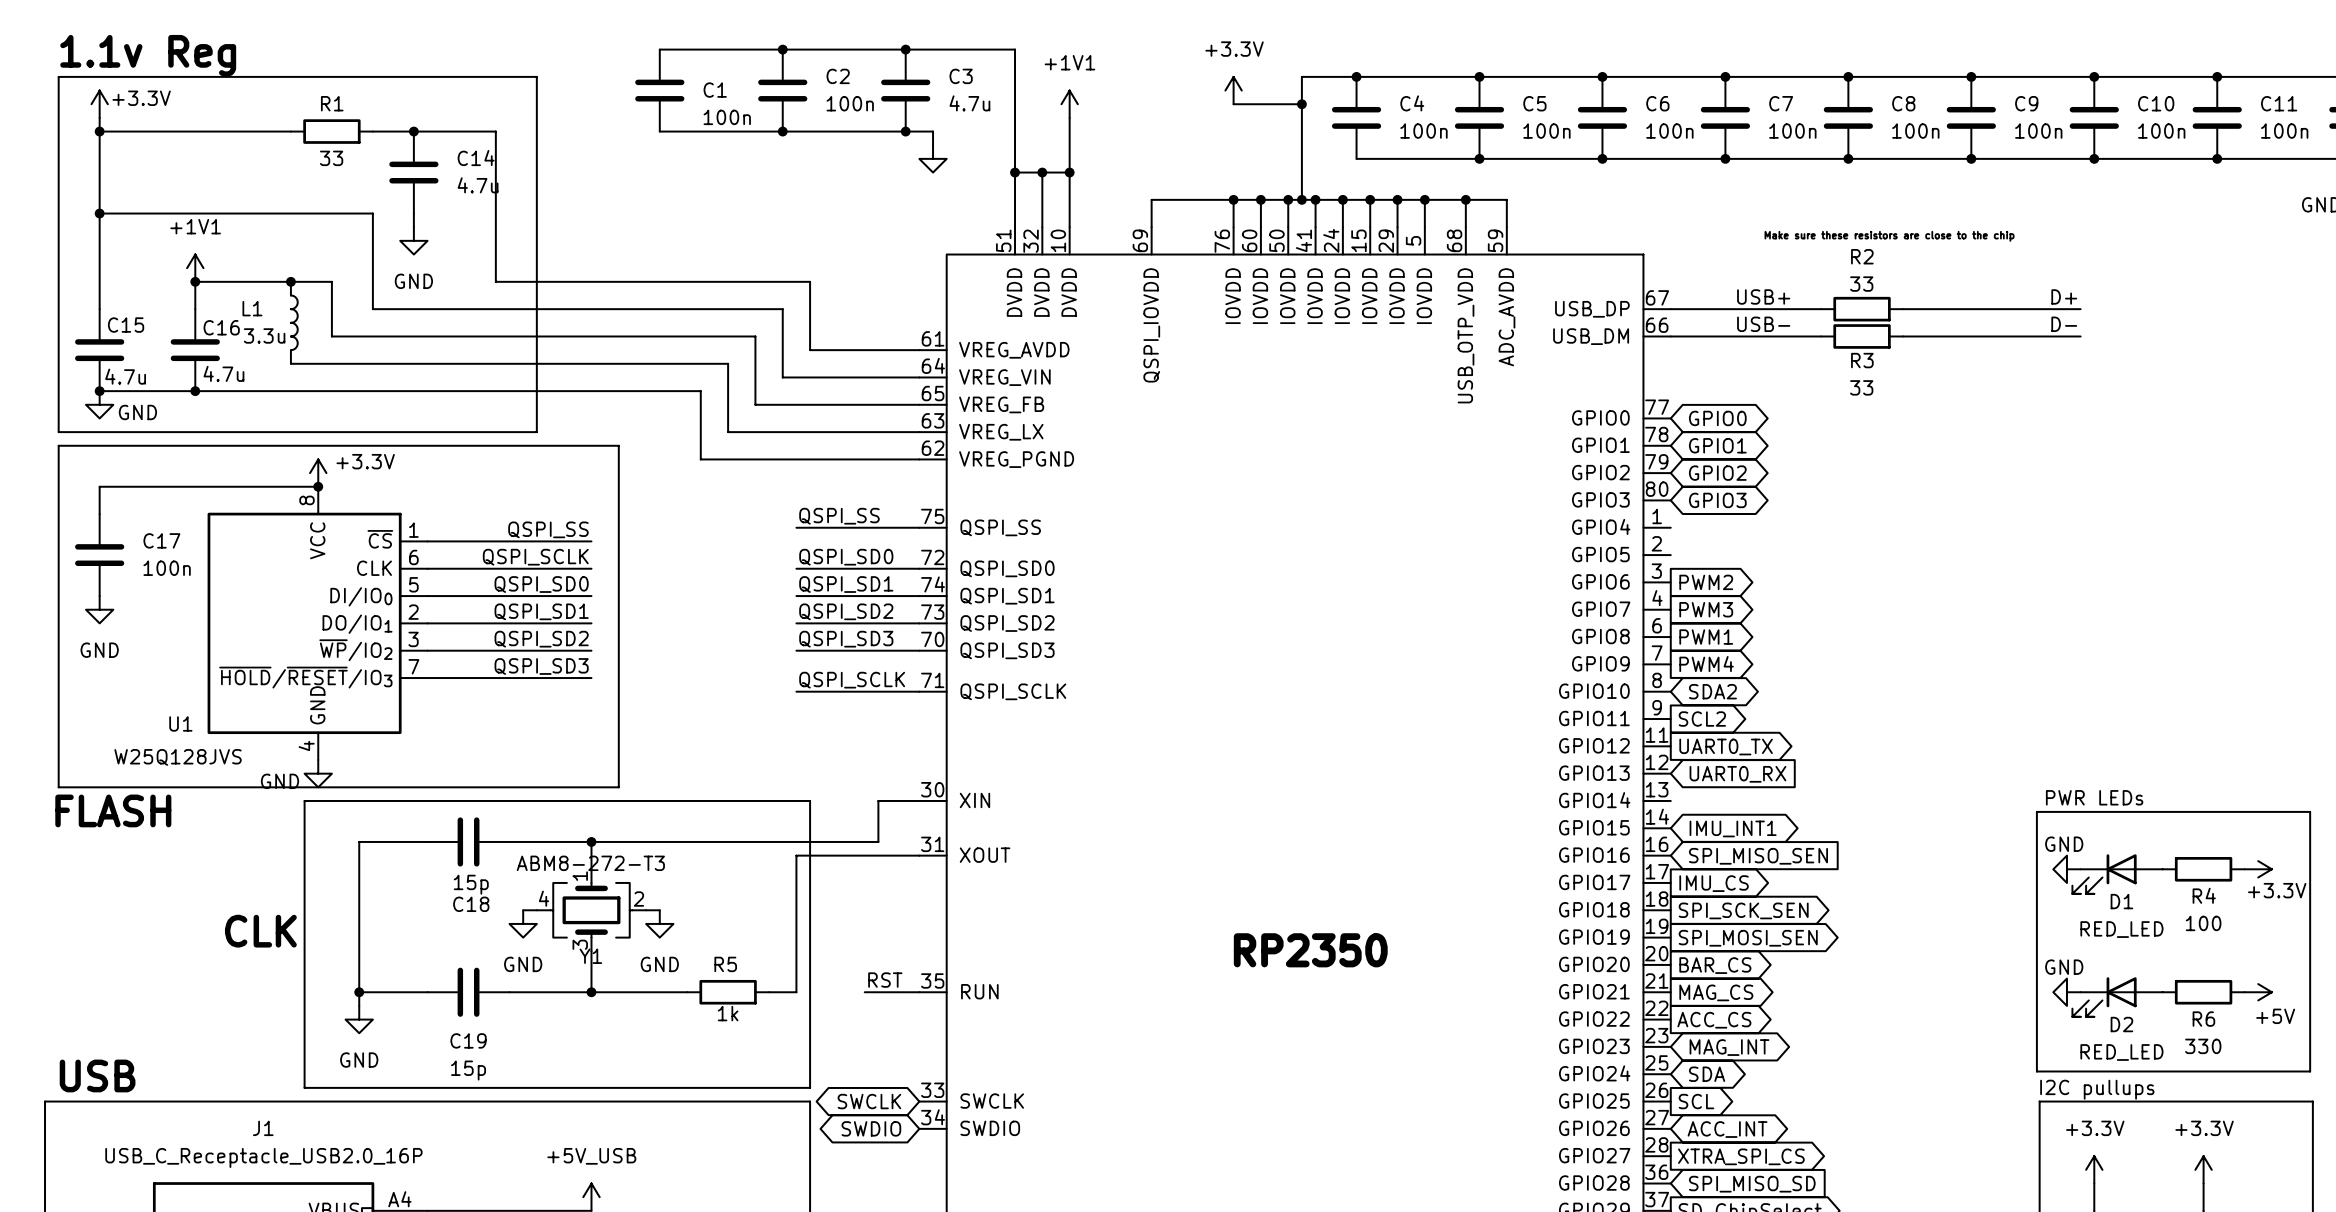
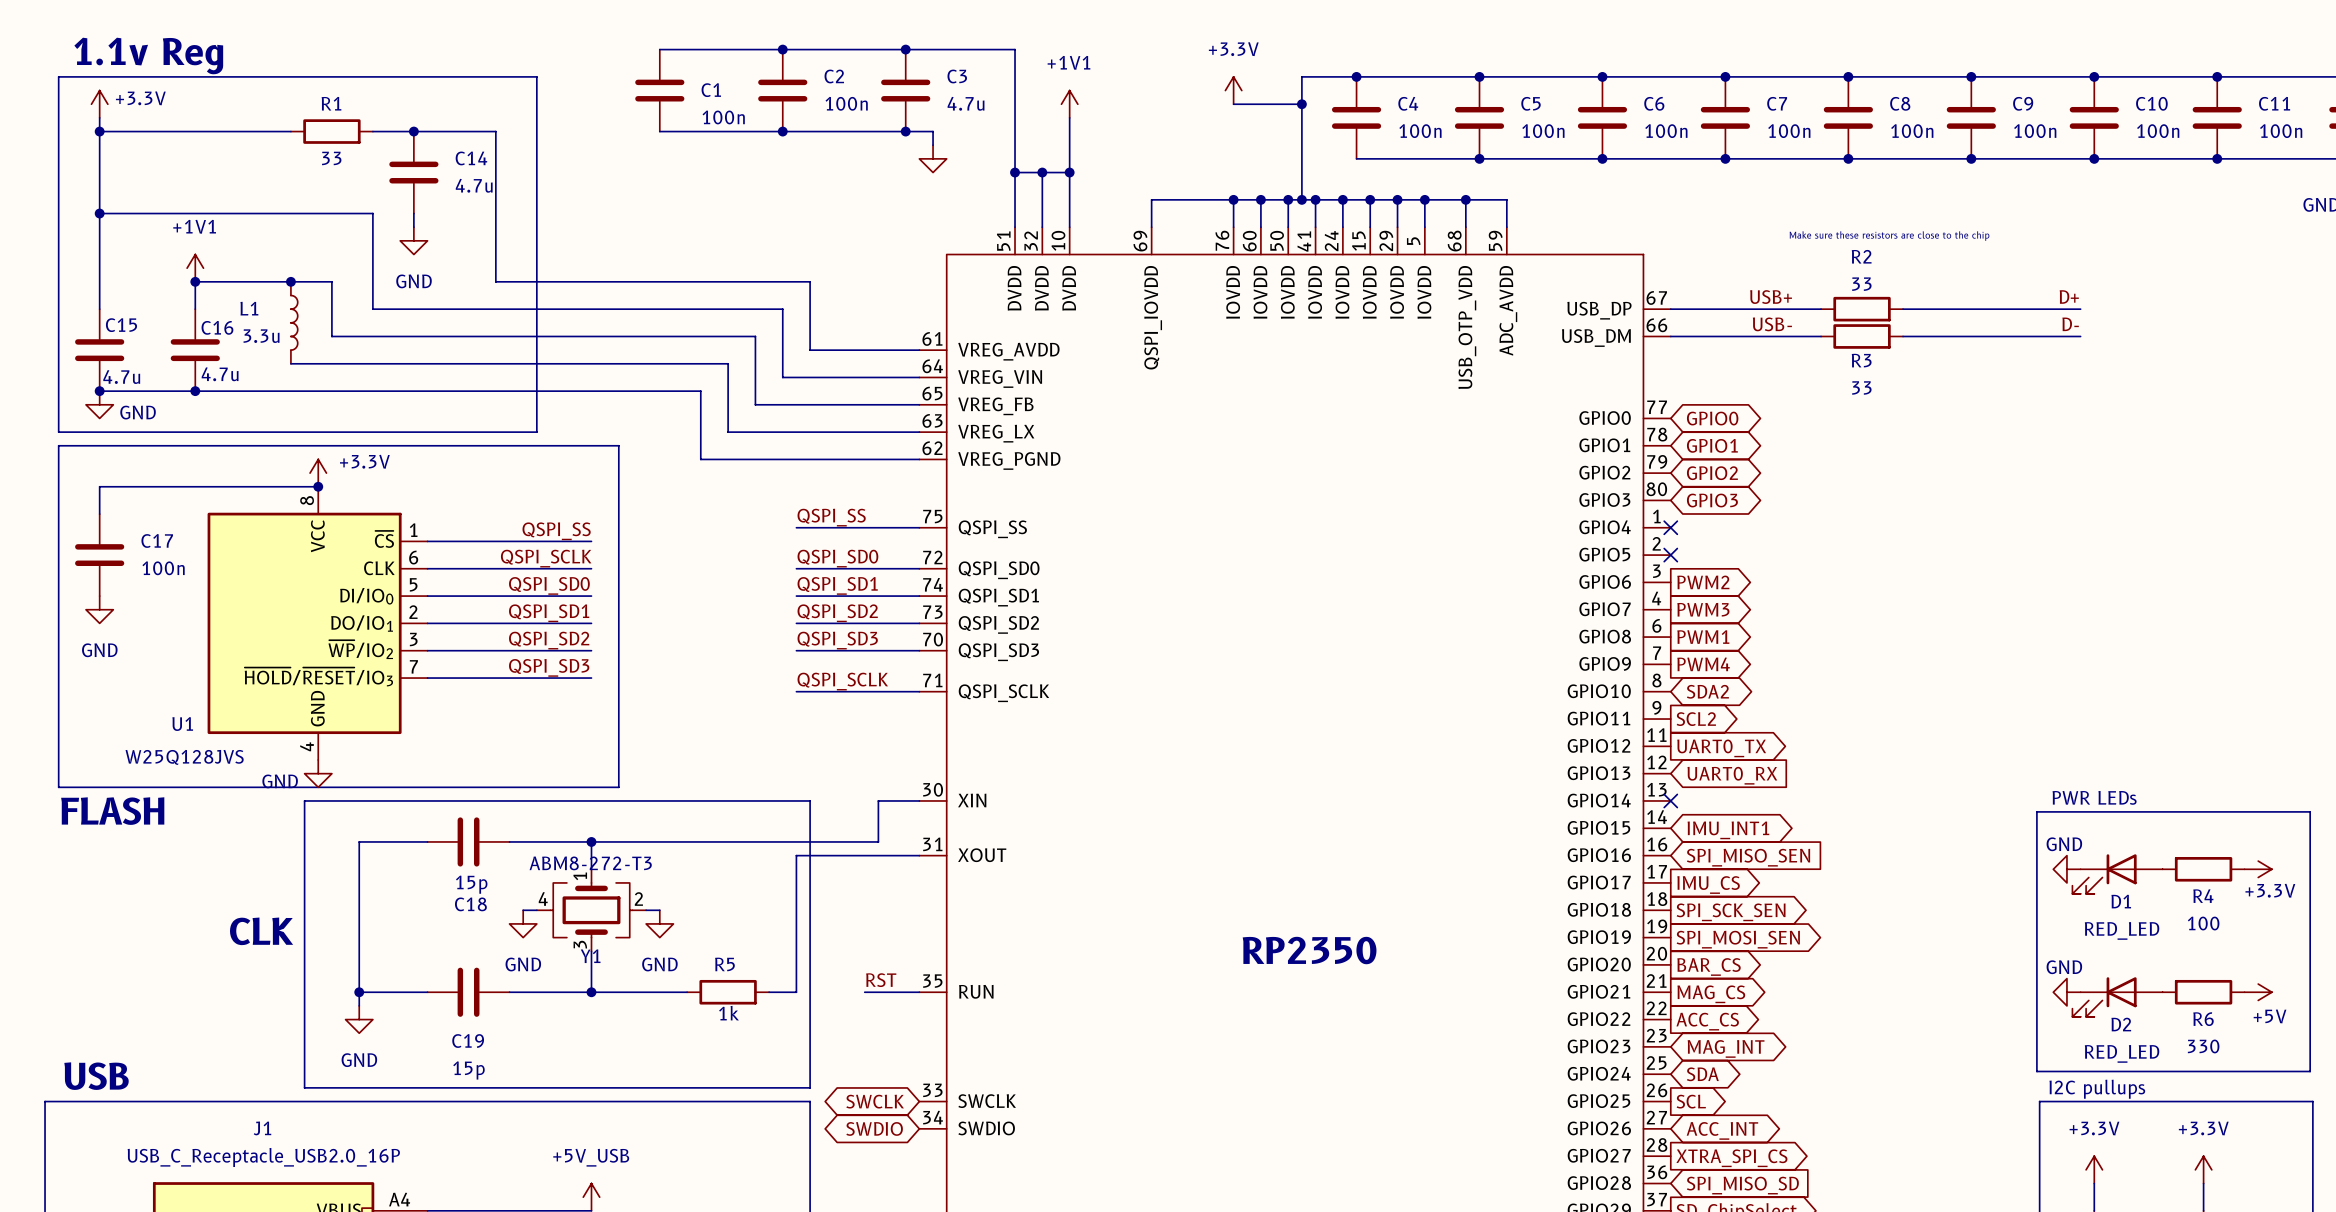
no-connect mark: none -> (1670, 527)
no-connect mark: none -> (1670, 555)
no-connect mark: none -> (1670, 800)

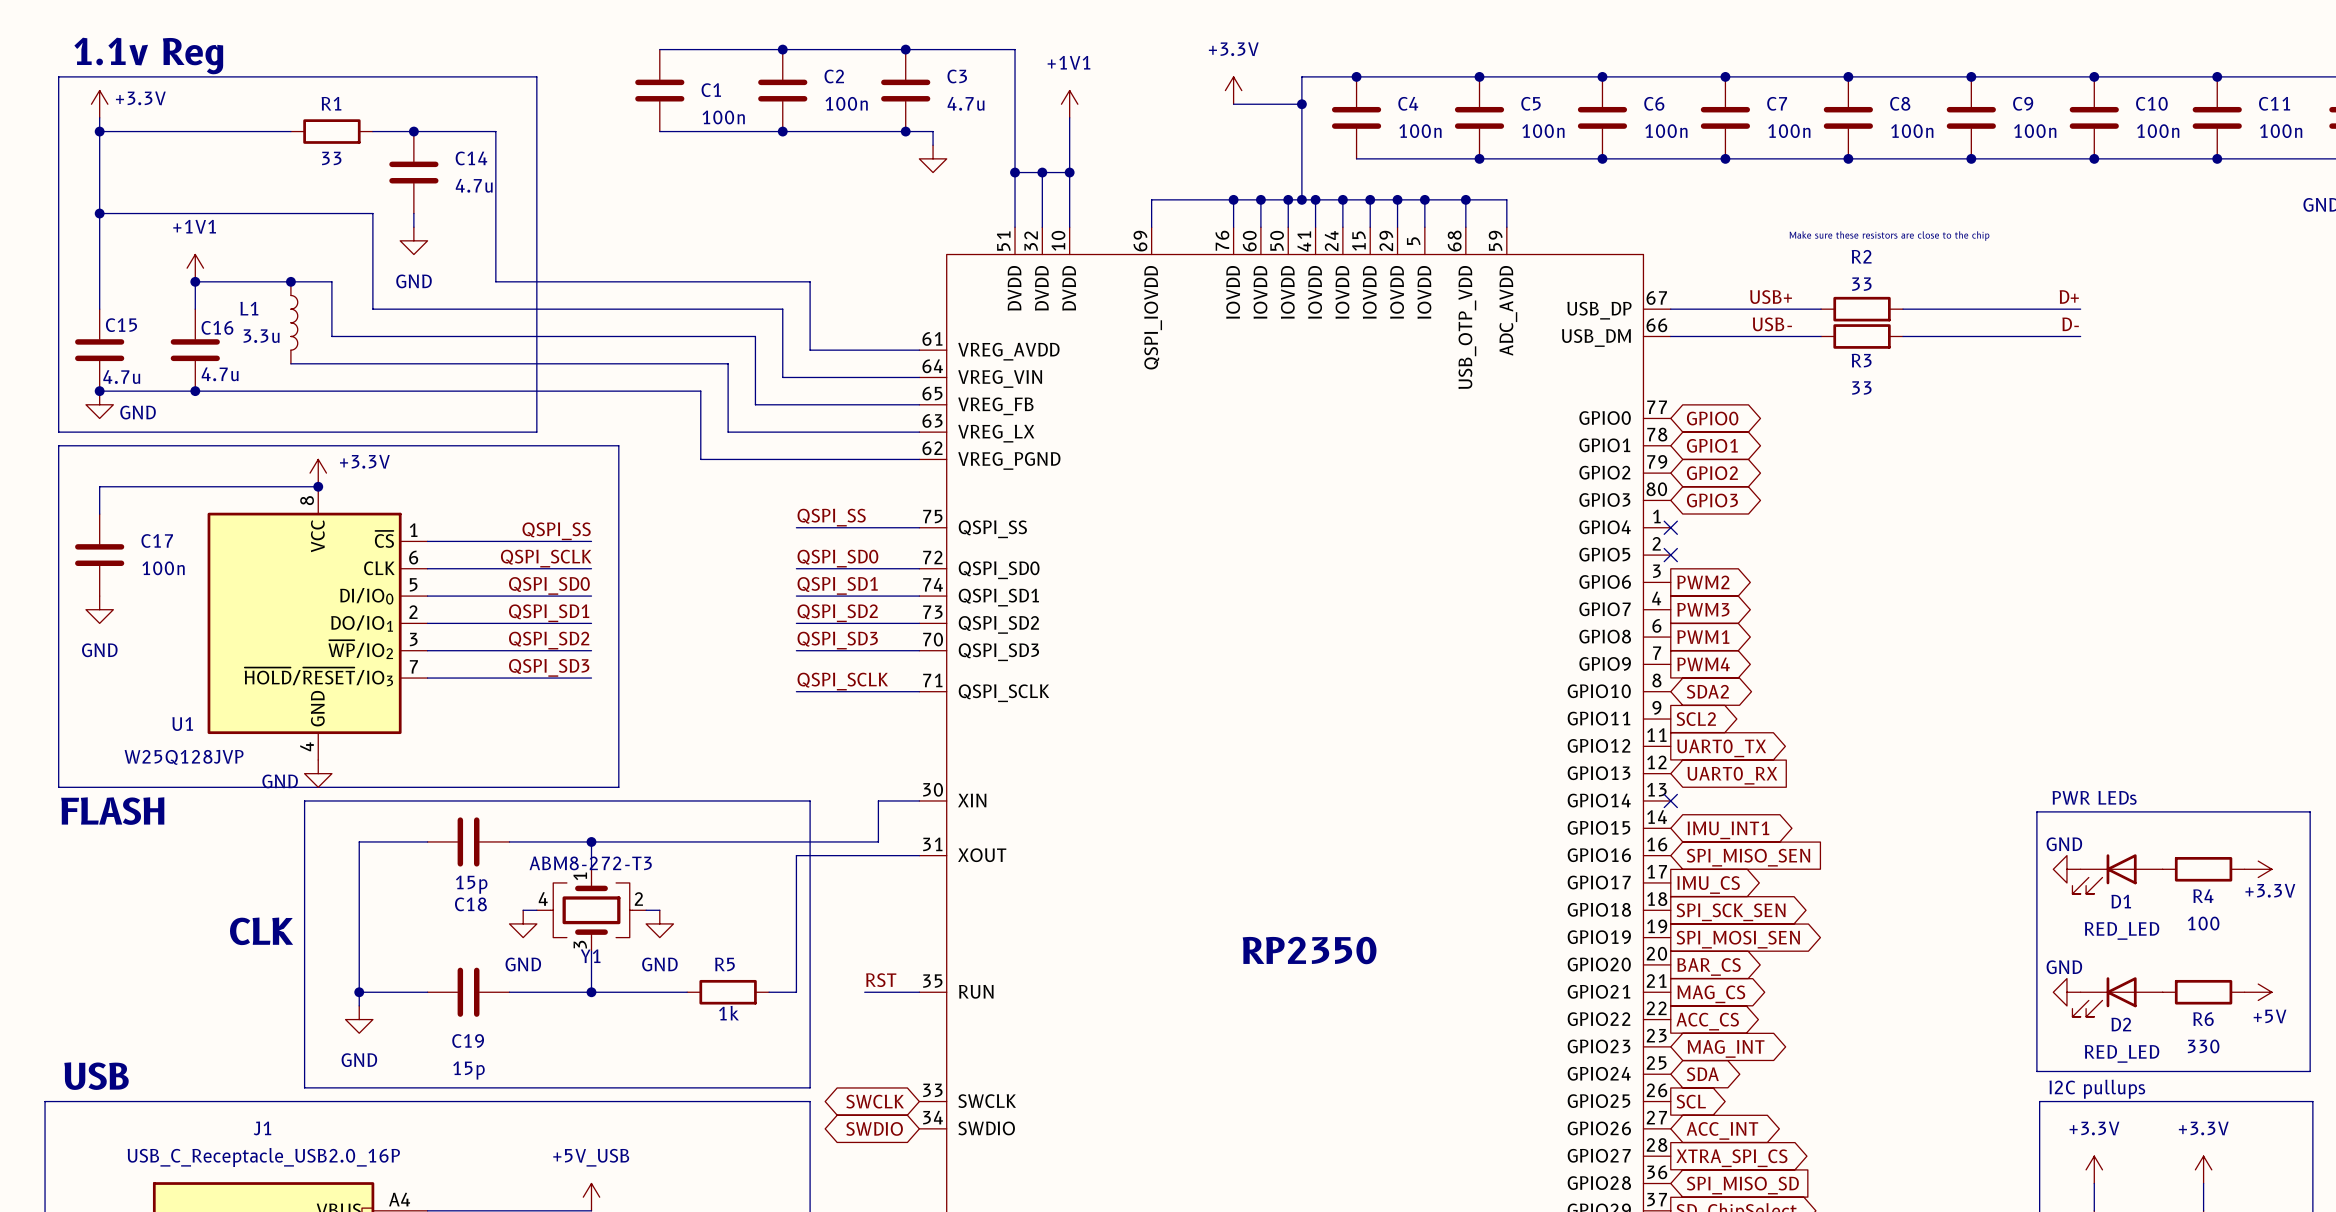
U1 value: W25Q128JVS (184, 757) -> W25Q128JVP (184, 757)

